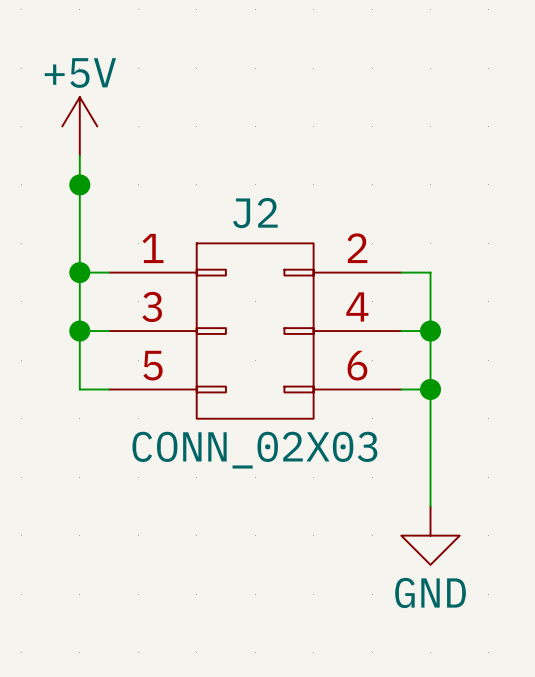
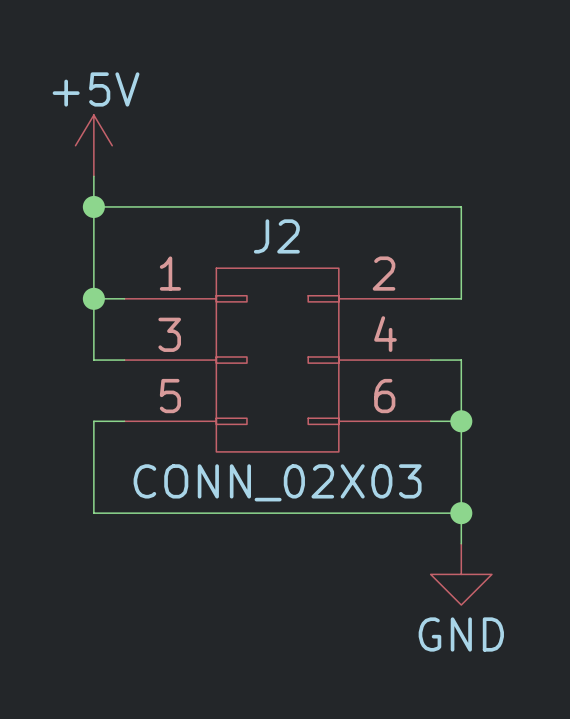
wire: (430, 272) (430, 331) -> (461, 298) (461, 206) (93, 206)
wire: (79, 331) (79, 389) -> (461, 513) (93, 513) (93, 421)
junction: (79, 331) -> none
junction: (430, 331) -> none
junction: none -> (461, 513)

